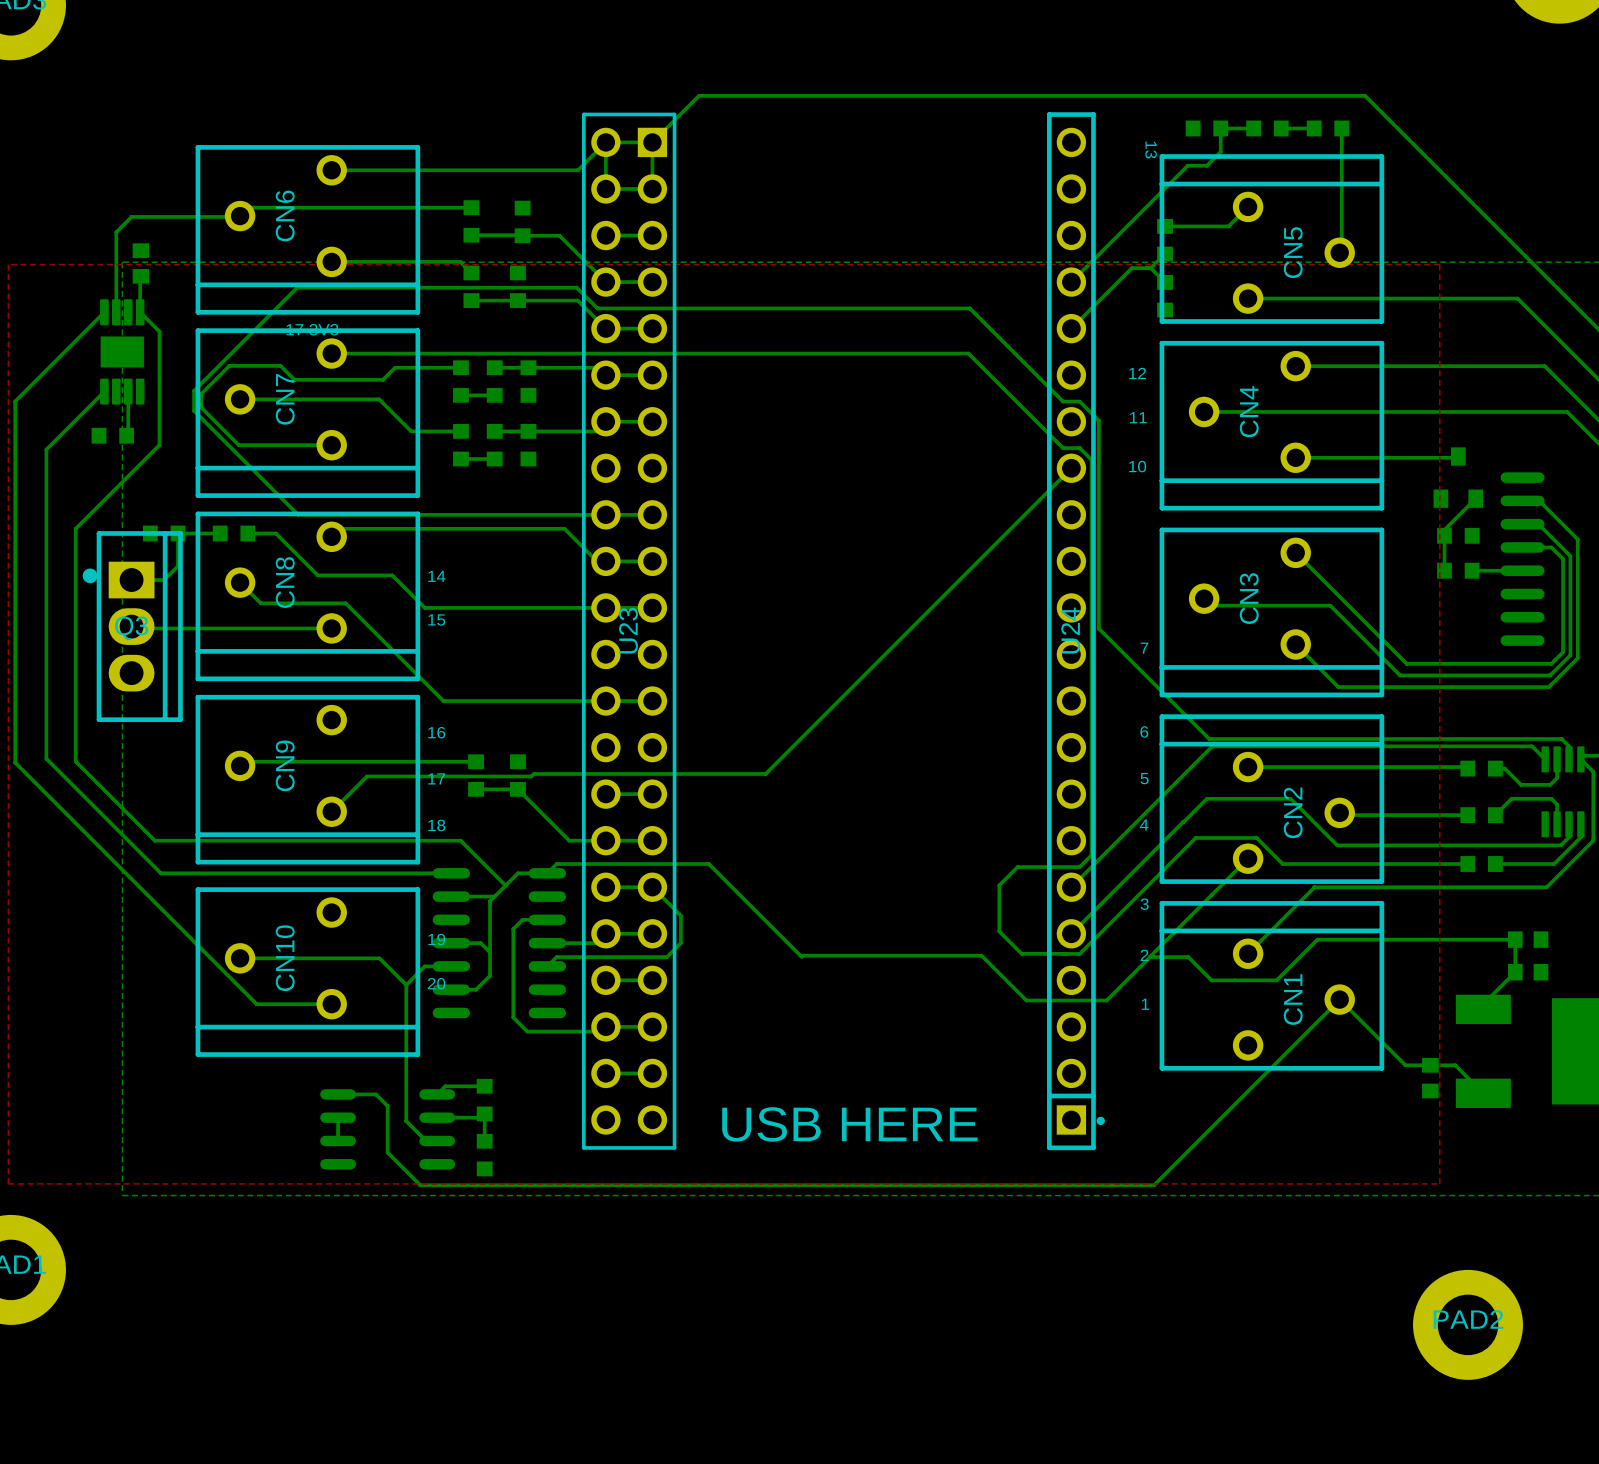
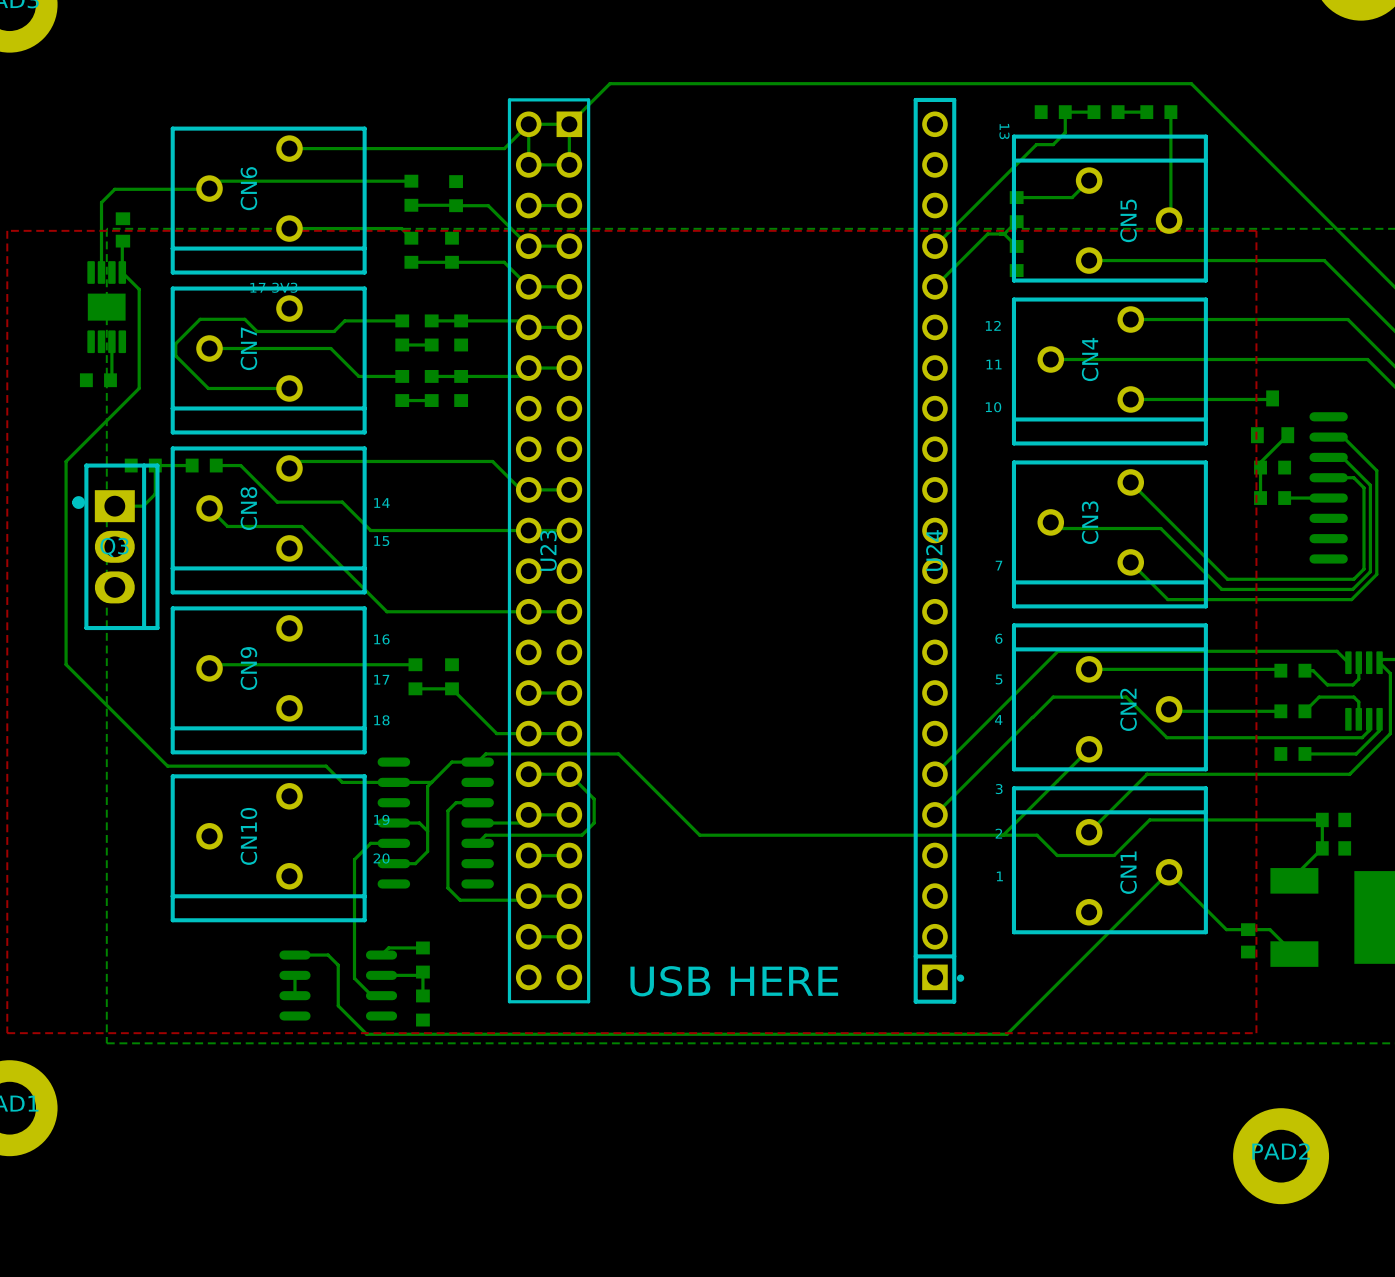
bottom track: (104, 312) (15, 401) (15, 762) (256, 1004) (331, 1004) -> none
bottom track: (331, 353) (968, 353) (1063, 448) (1079, 448) (1091, 459) (1091, 855) (1079, 867) (1017, 867) (999, 885) (999, 931) (1021, 953) (1066, 953) -> none
bottom track: (104, 391) (46, 449) (46, 758) (160, 873) (451, 873) -> none
bottom track: (1071, 468) (765, 773) (366, 776) (331, 811) -> none
bottom track: (652, 514) (298, 514) (194, 410) (194, 390) (297, 287) (576, 287) (597, 308) (969, 308) (1063, 401) (1079, 401) (1098, 420) (1098, 628) (1209, 739) (1561, 739) (1568, 746) (1568, 759) -> none
bottom track: (133, 628) (331, 628) -> none
bottom track: (154, 840) (460, 840) (505, 885) -> (135, 733) (167, 766) (326, 766) (342, 782) (393, 782)
bottom track: (1467, 863) (1282, 863) (1256, 837) (1195, 837) (1079, 953) (1063, 953) -> none
bottom track: (800, 955) (981, 955) (1026, 1000) (1106, 1000) (1150, 957) -> (699, 835) (1003, 835)
bottom track: (240, 958) (379, 958) (406, 985) -> none

